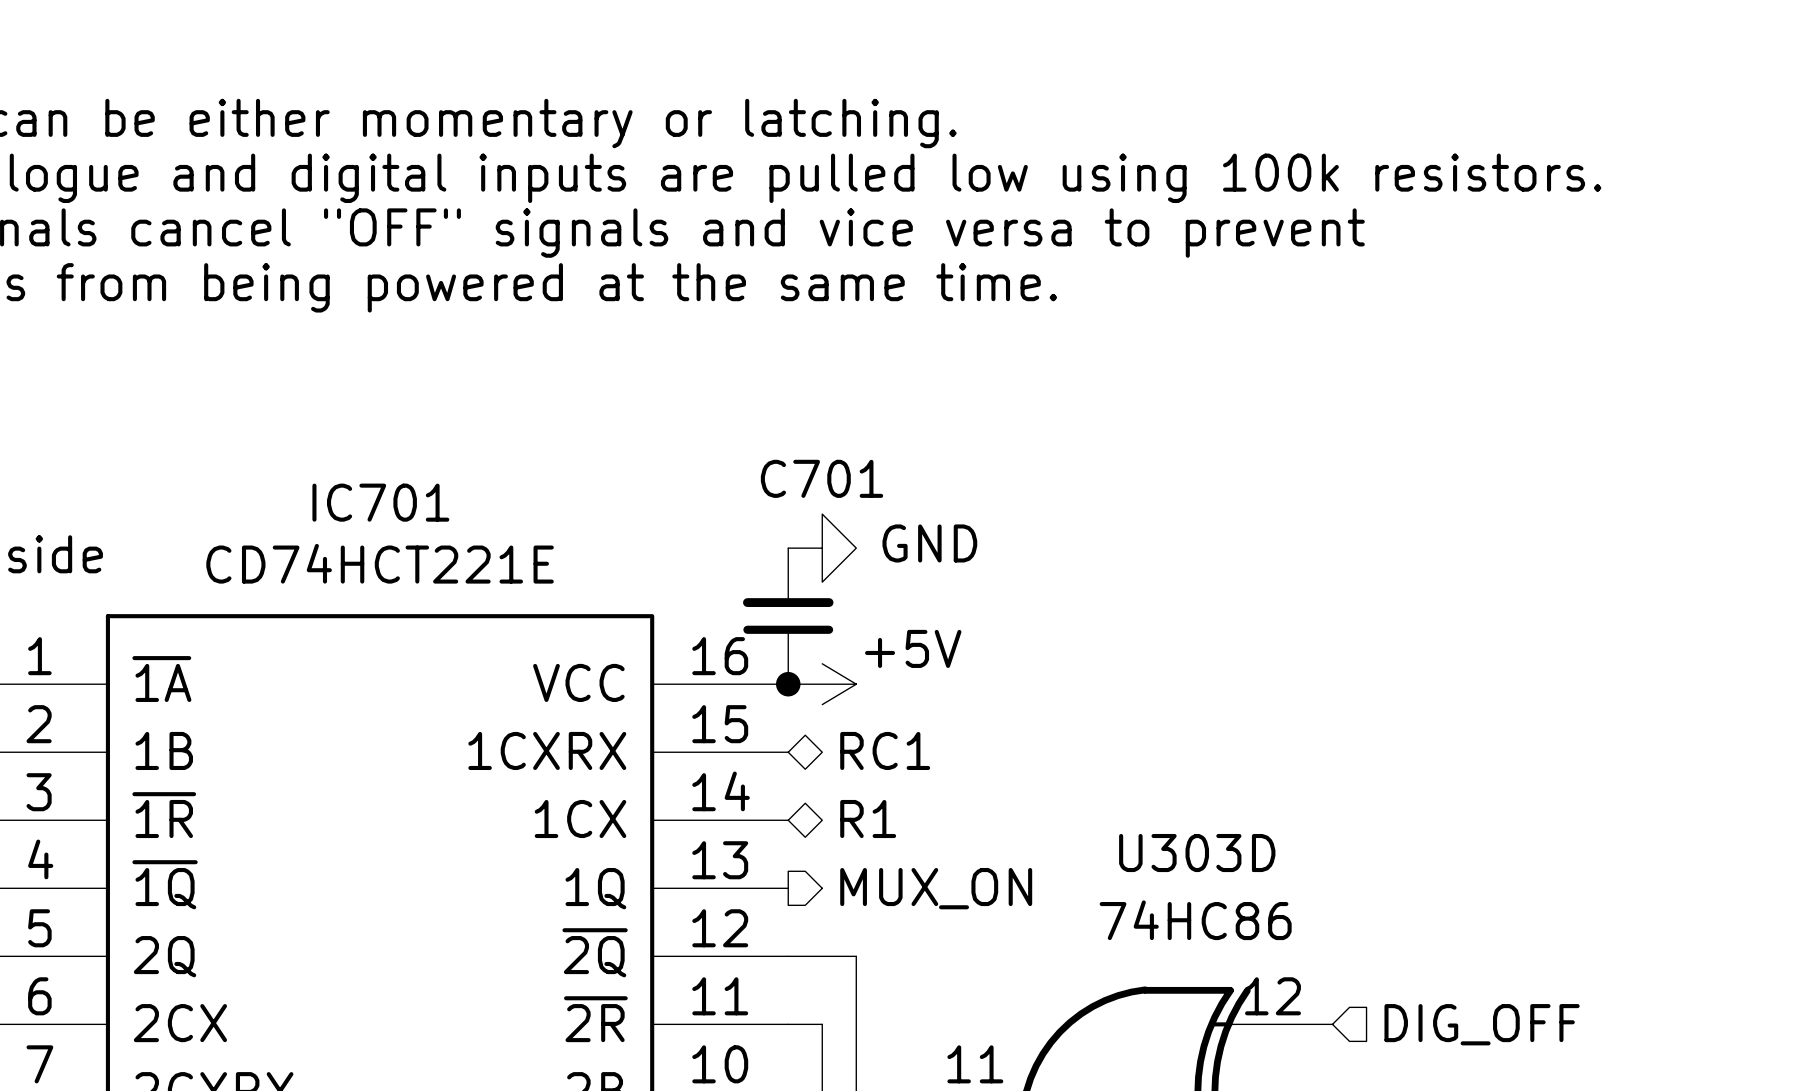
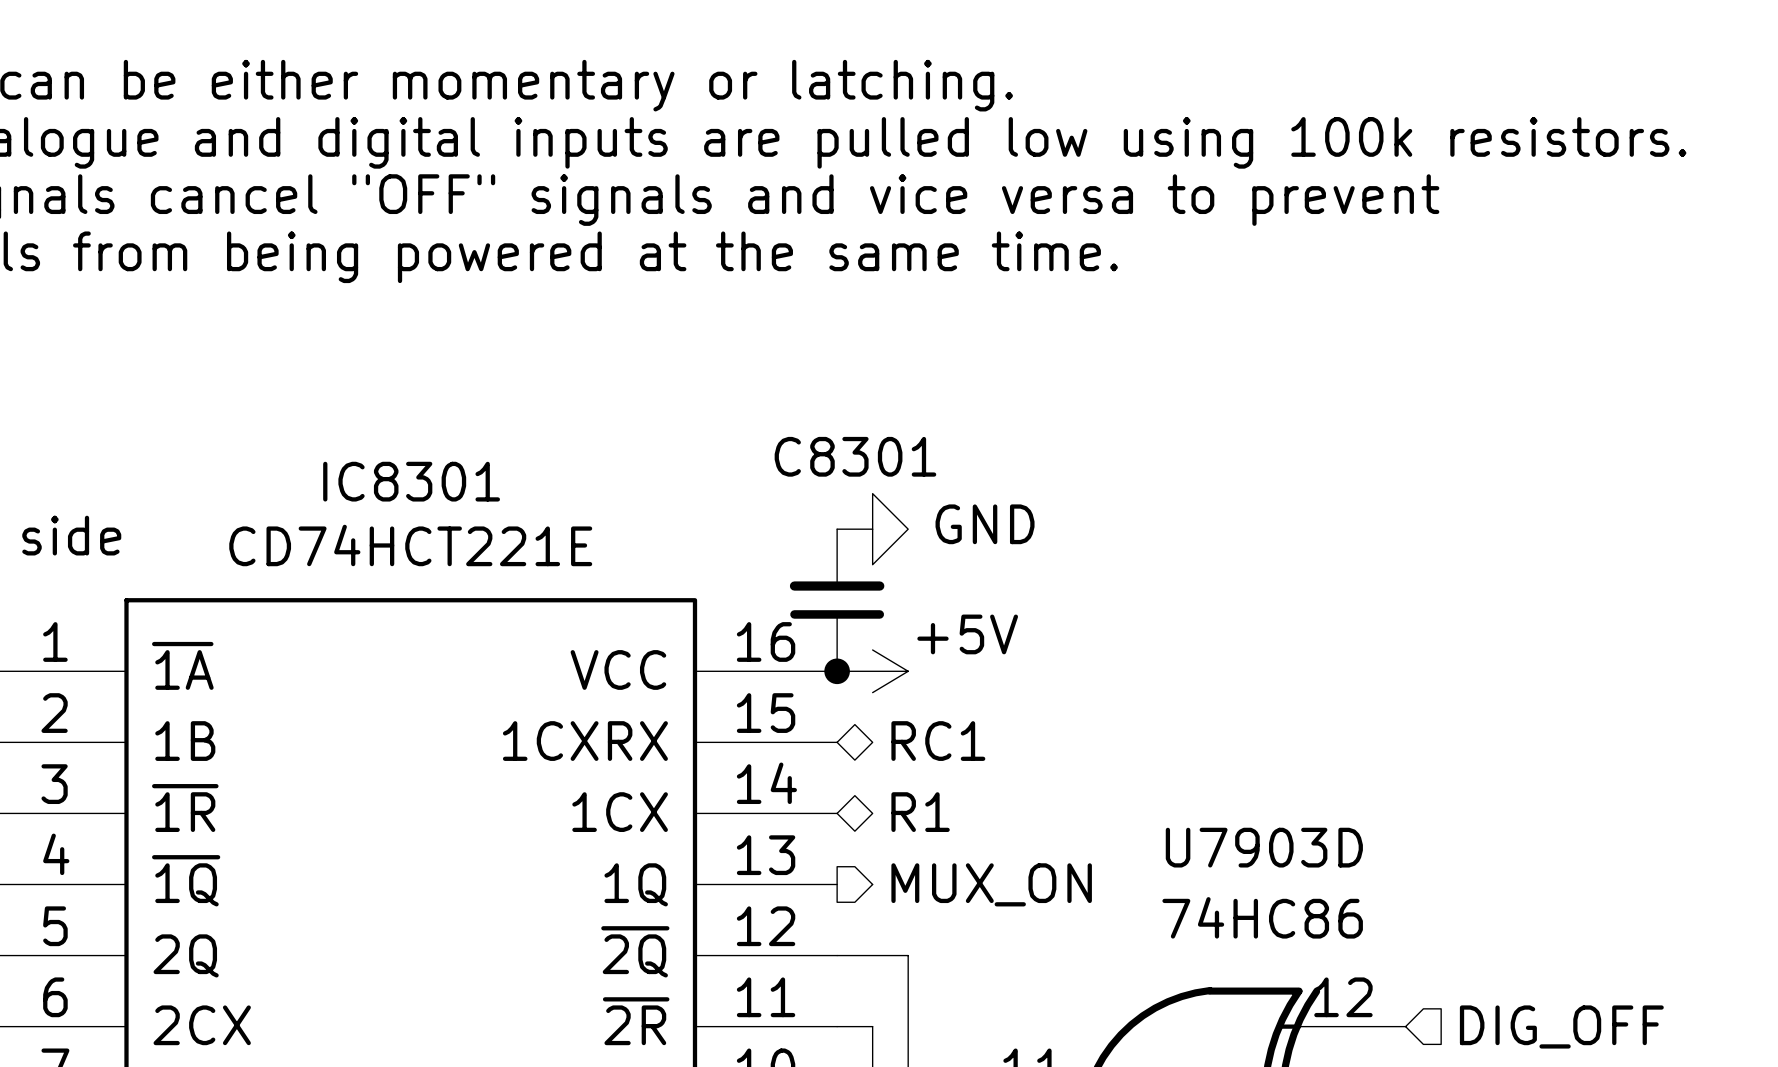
C701 name: C701 (822, 478) -> C8301 (855, 456)
IC701 name: IC701 (380, 502) -> IC8301 (411, 481)
U303D name: U303D (1197, 853) -> U7903D (1264, 847)

